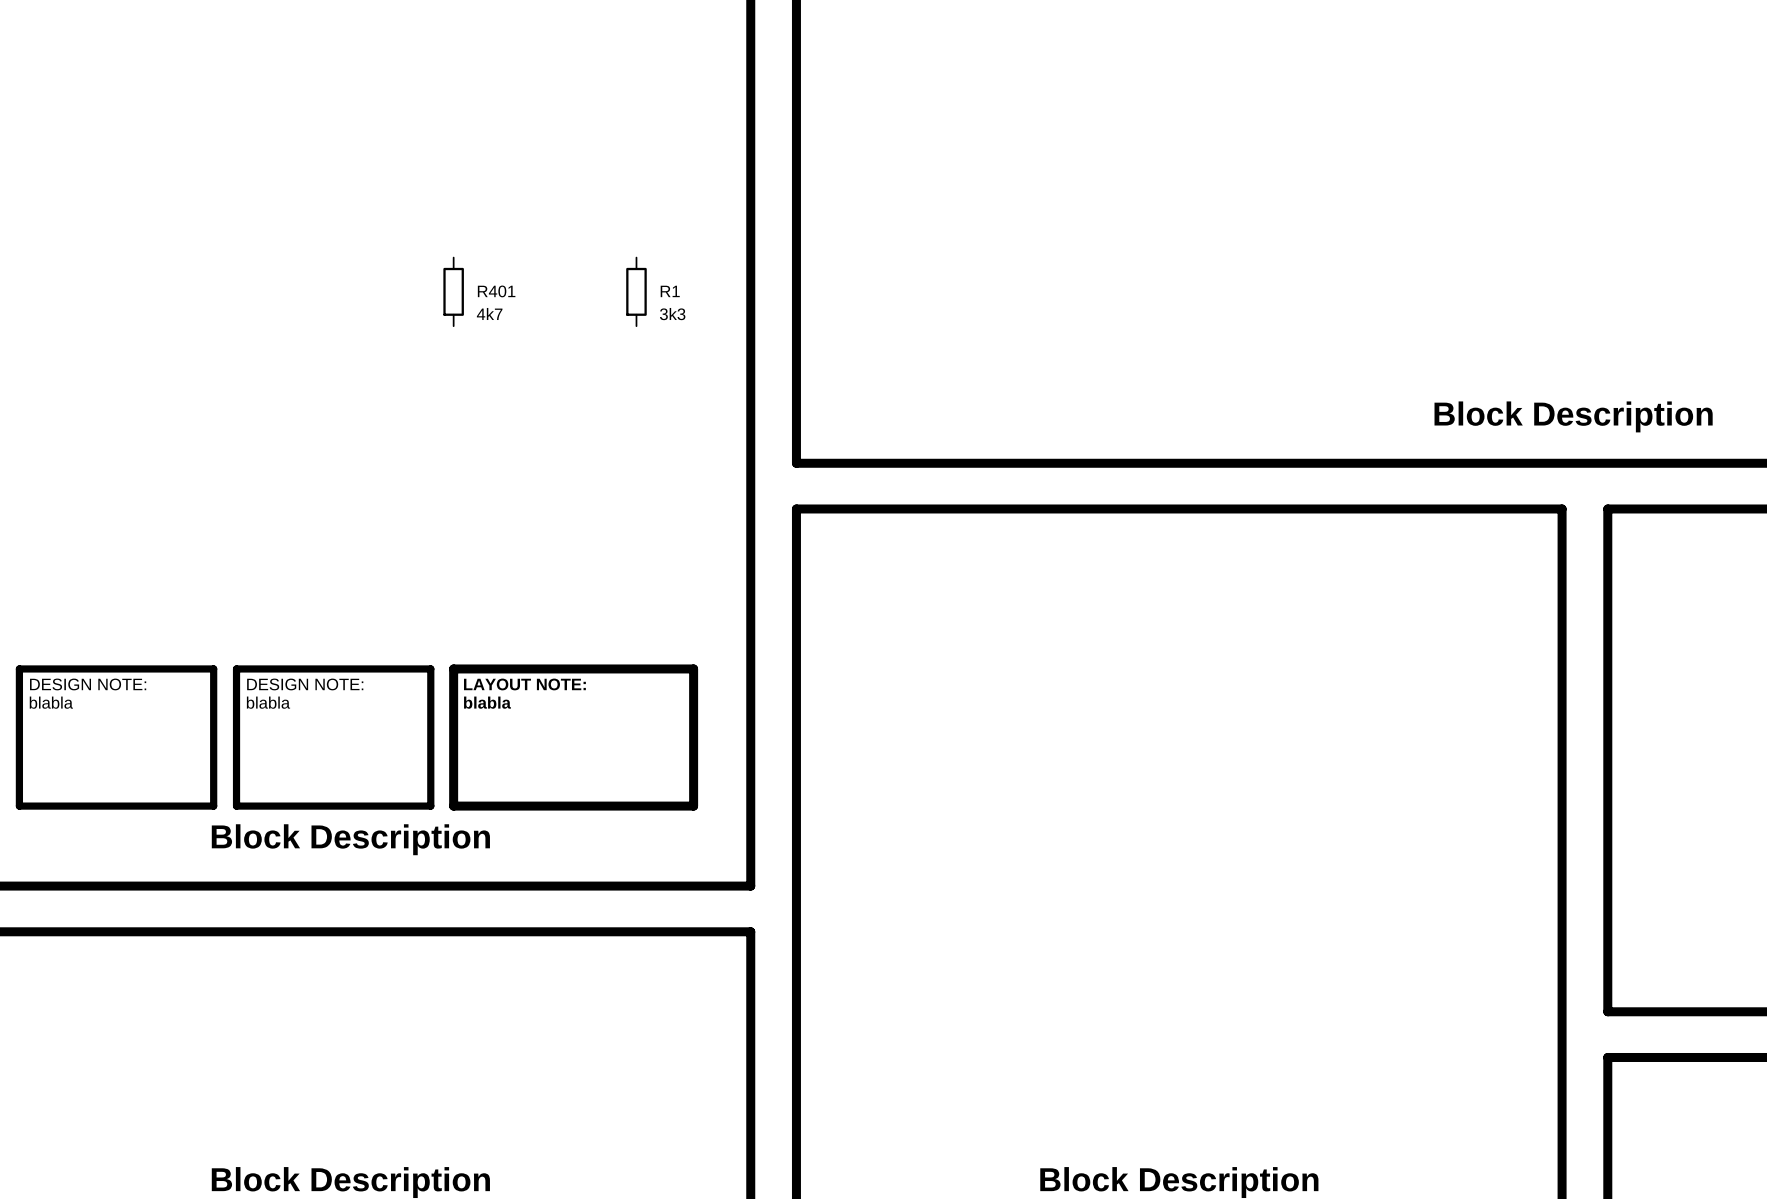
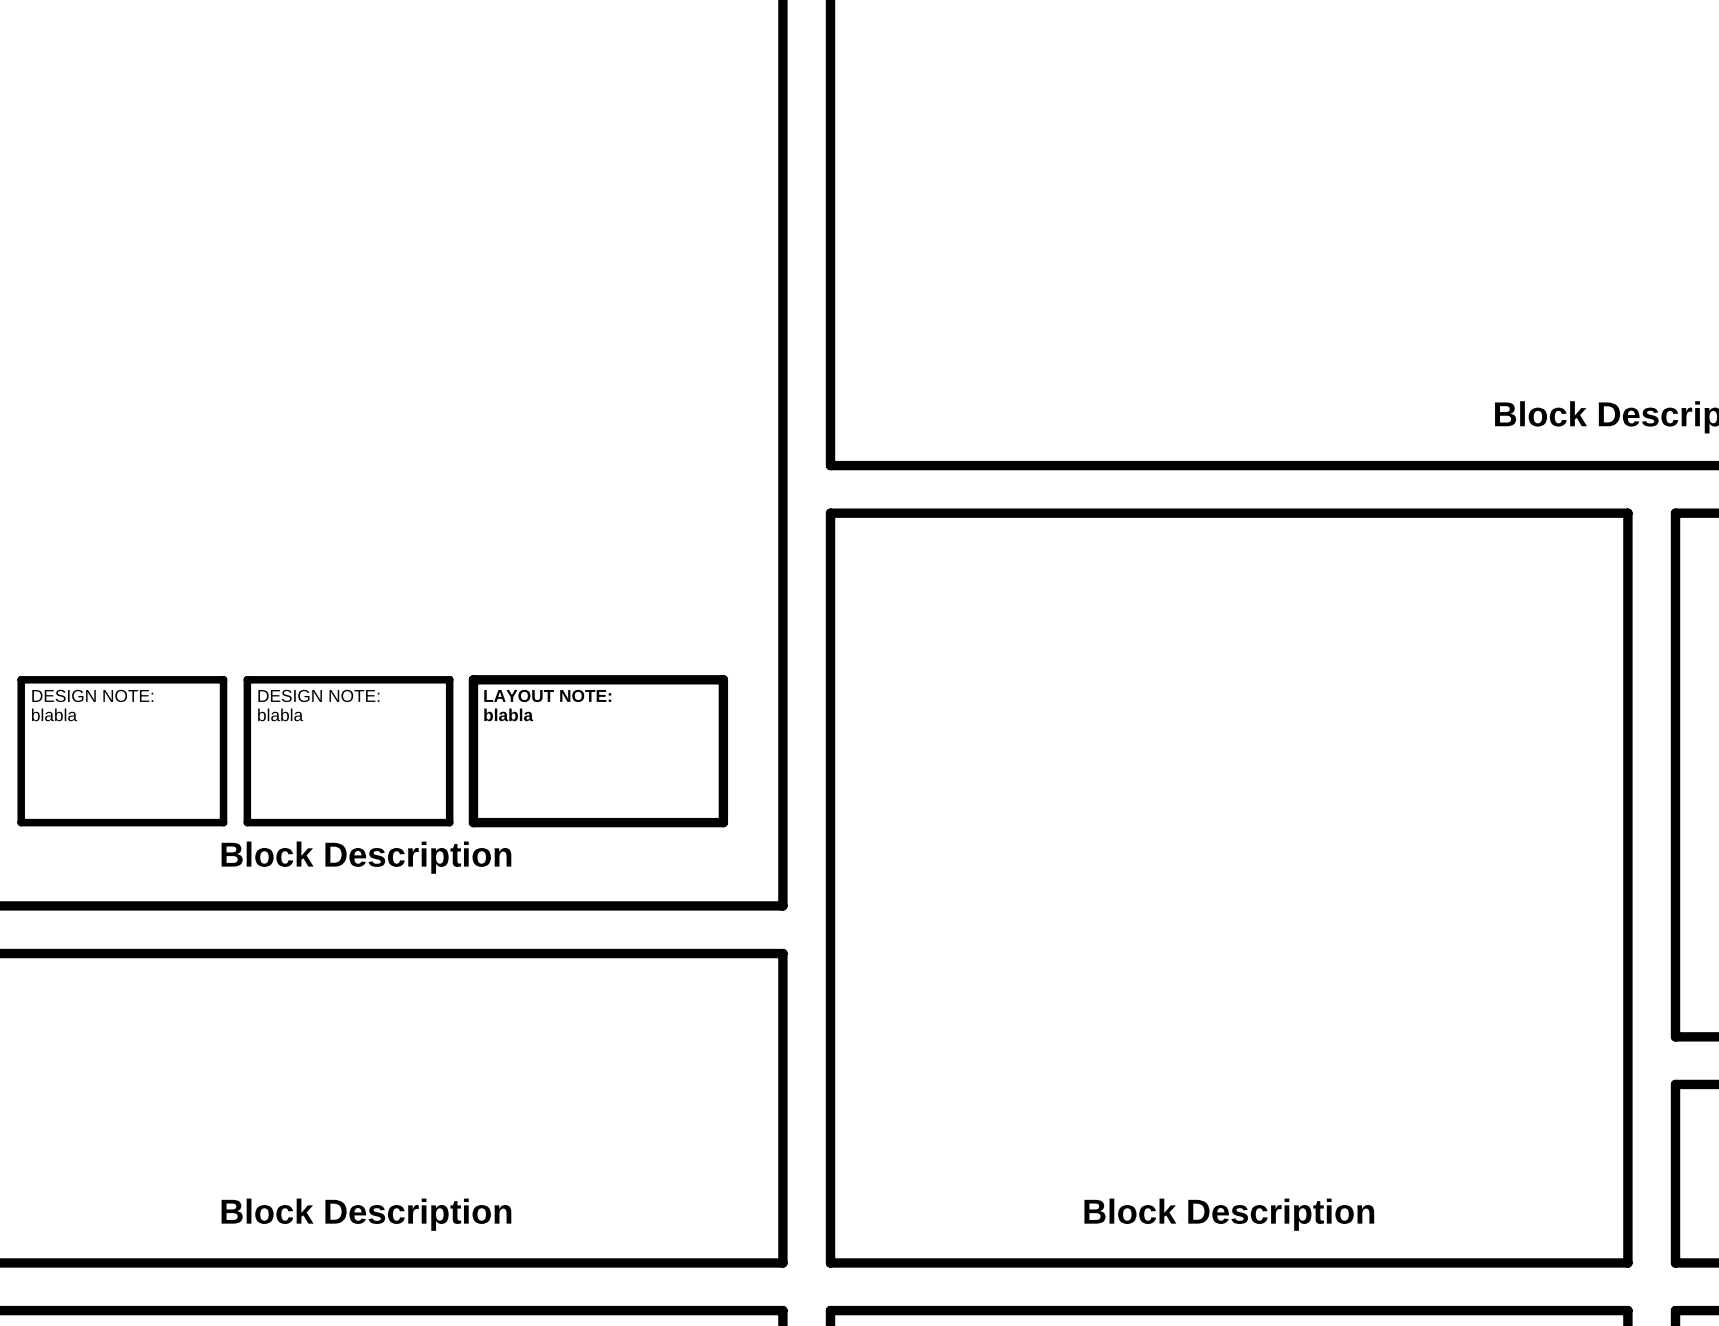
R401: 4k7 (453, 291) -> none
R1: 3k3 (636, 291) -> none

